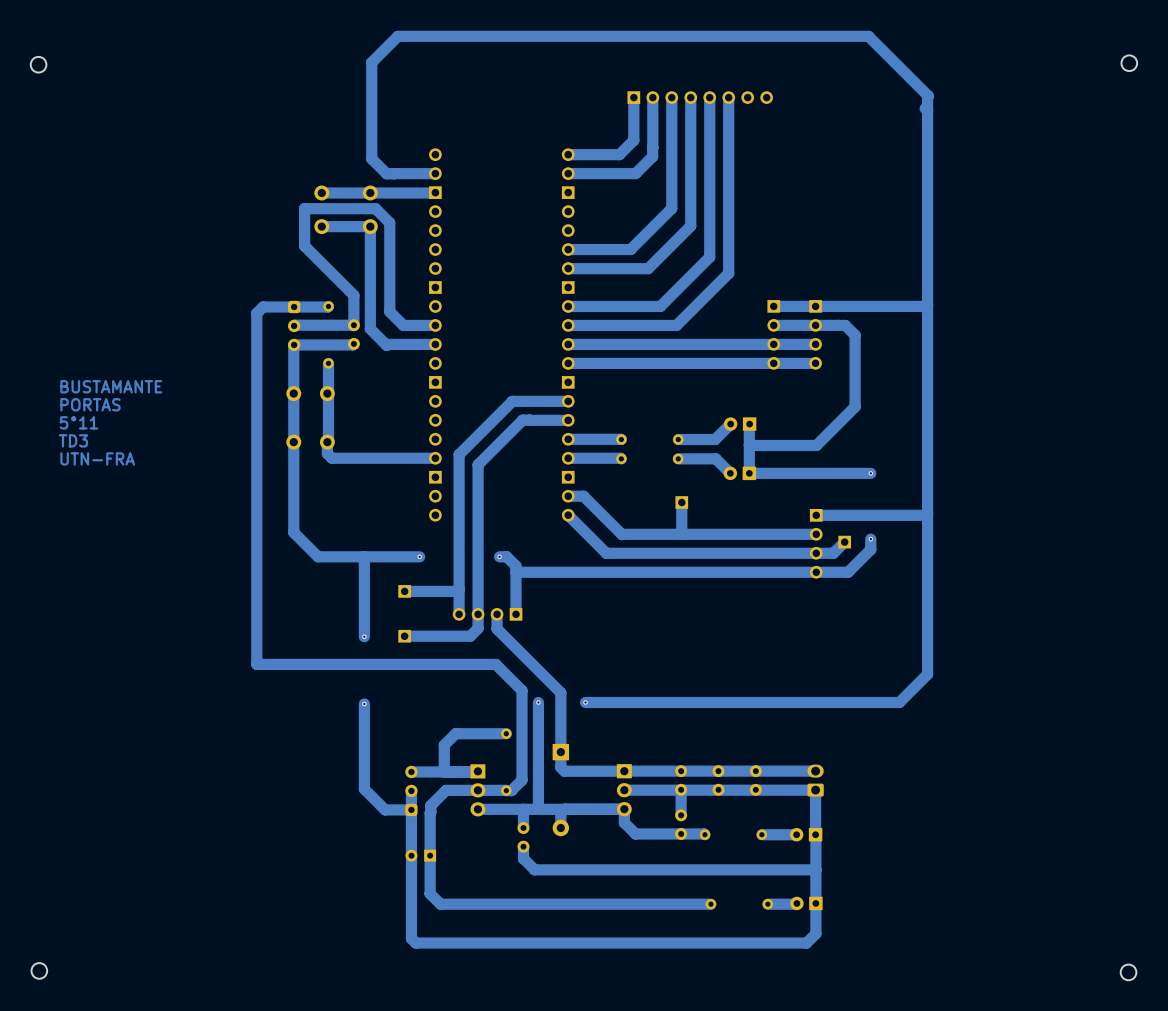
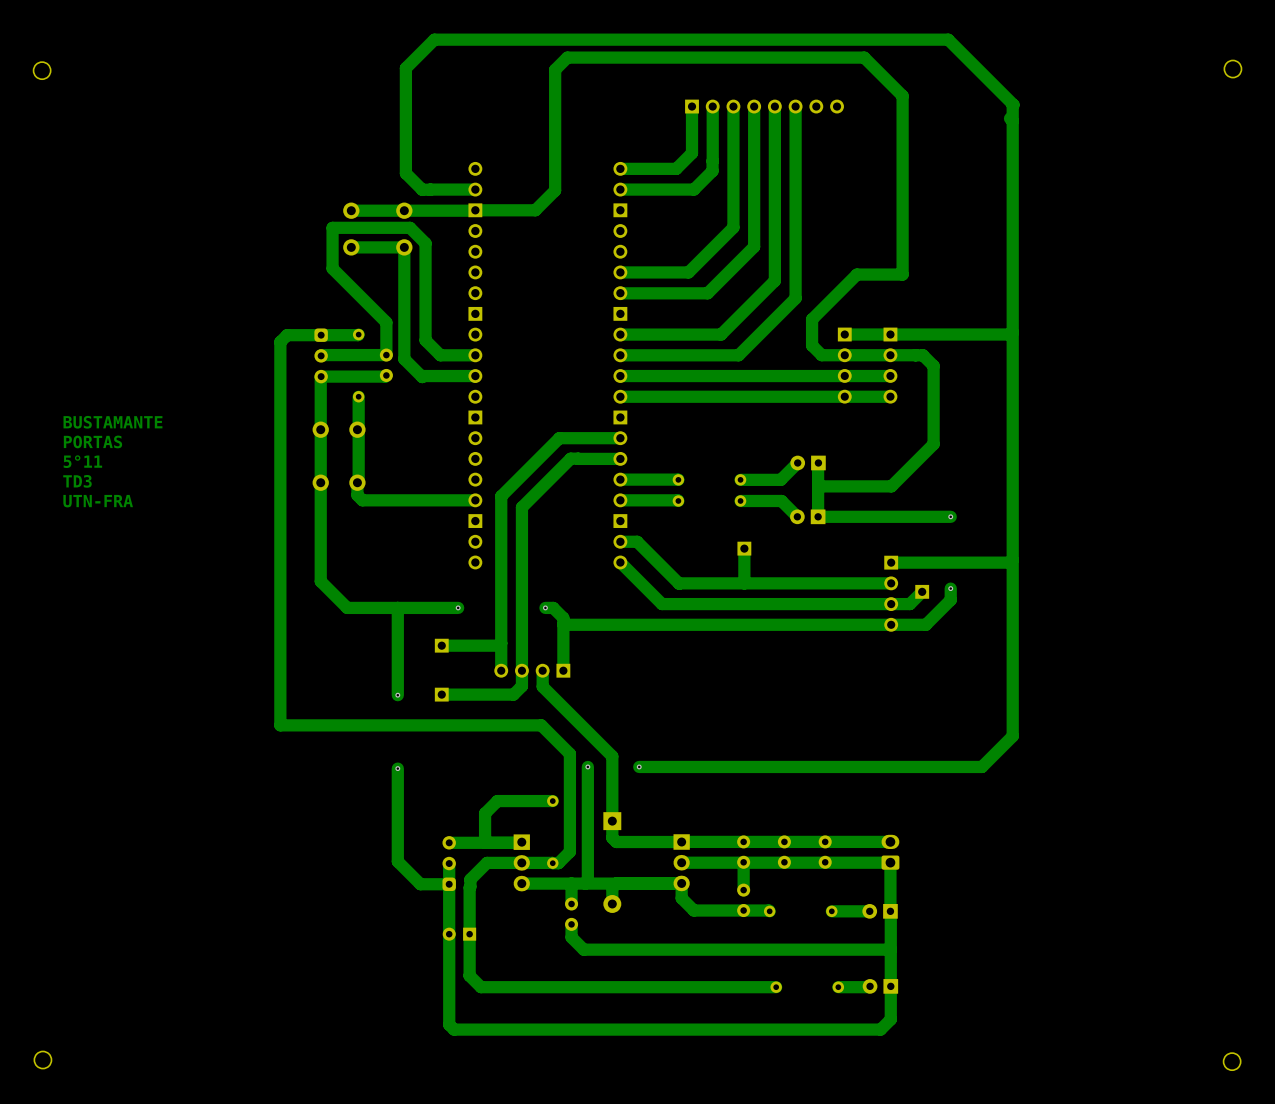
track: none -> (475, 210) (535, 210) (555, 190) (555, 69) (567, 57) (864, 57) (902, 95) (902, 274) (856, 274) (812, 319) (812, 345) (821, 355) (844, 355)

